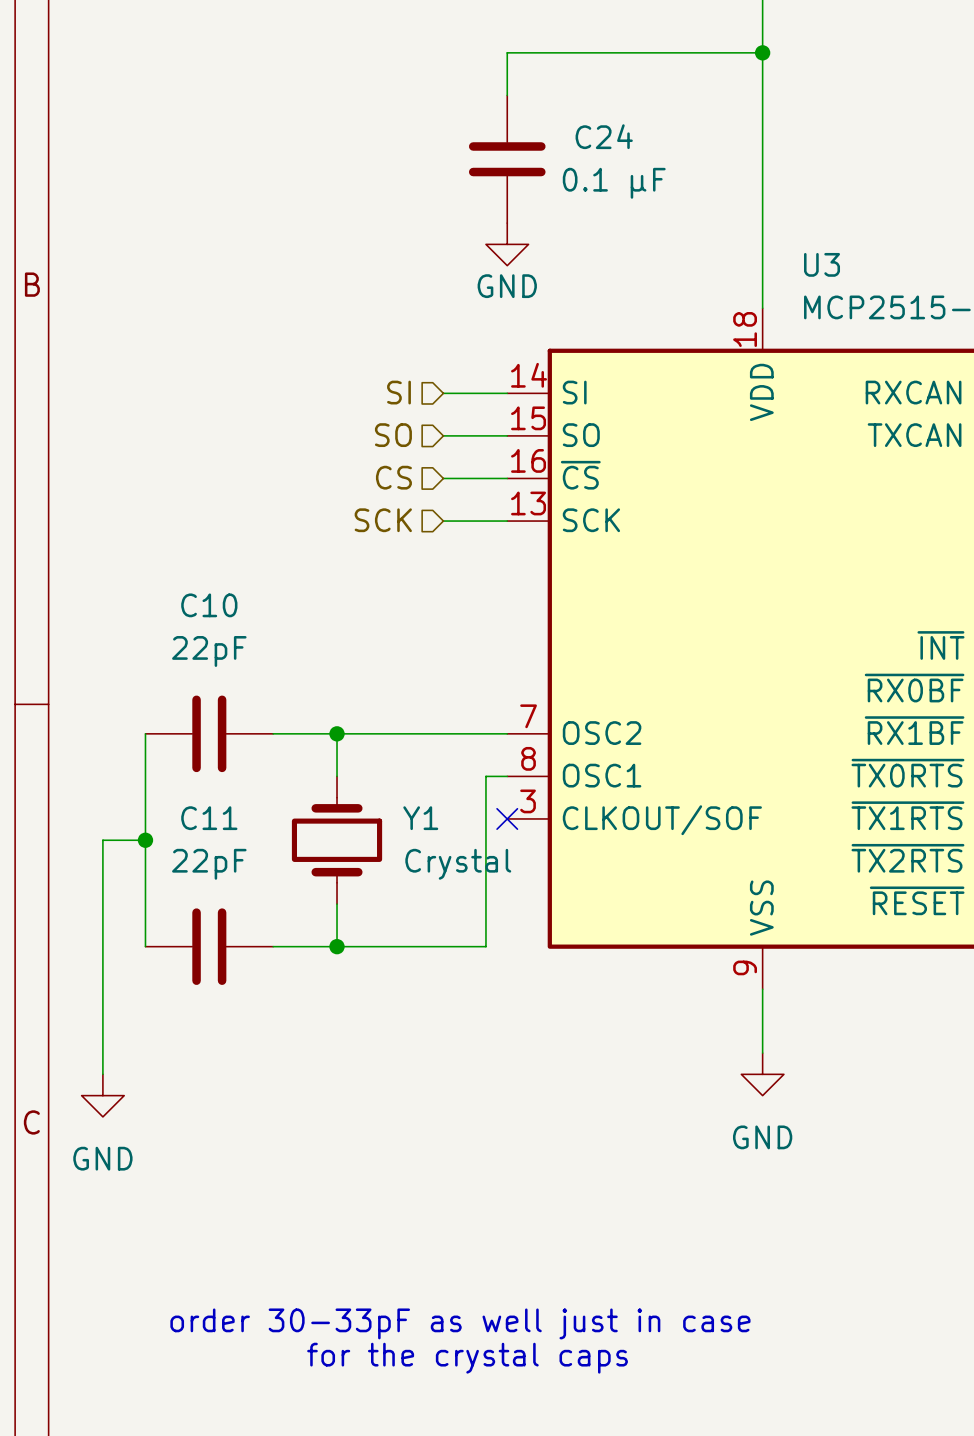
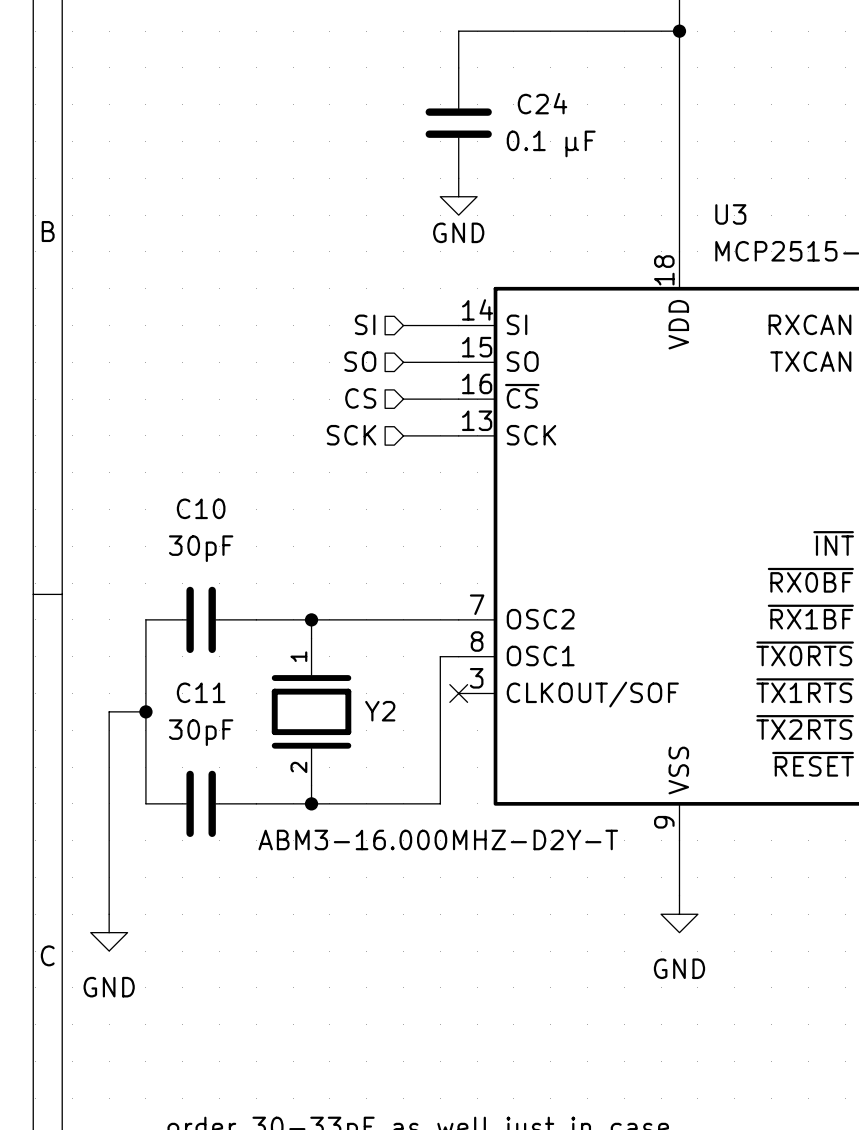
C10 value: 22pF (209, 651) -> 30pF (201, 548)
Y1: Crystal (337, 840) -> none
Y2: none -> ABM3-16.000MHZ-D2Y-T (311, 711)
C11 value: 22pF (209, 864) -> 30pF (201, 732)

